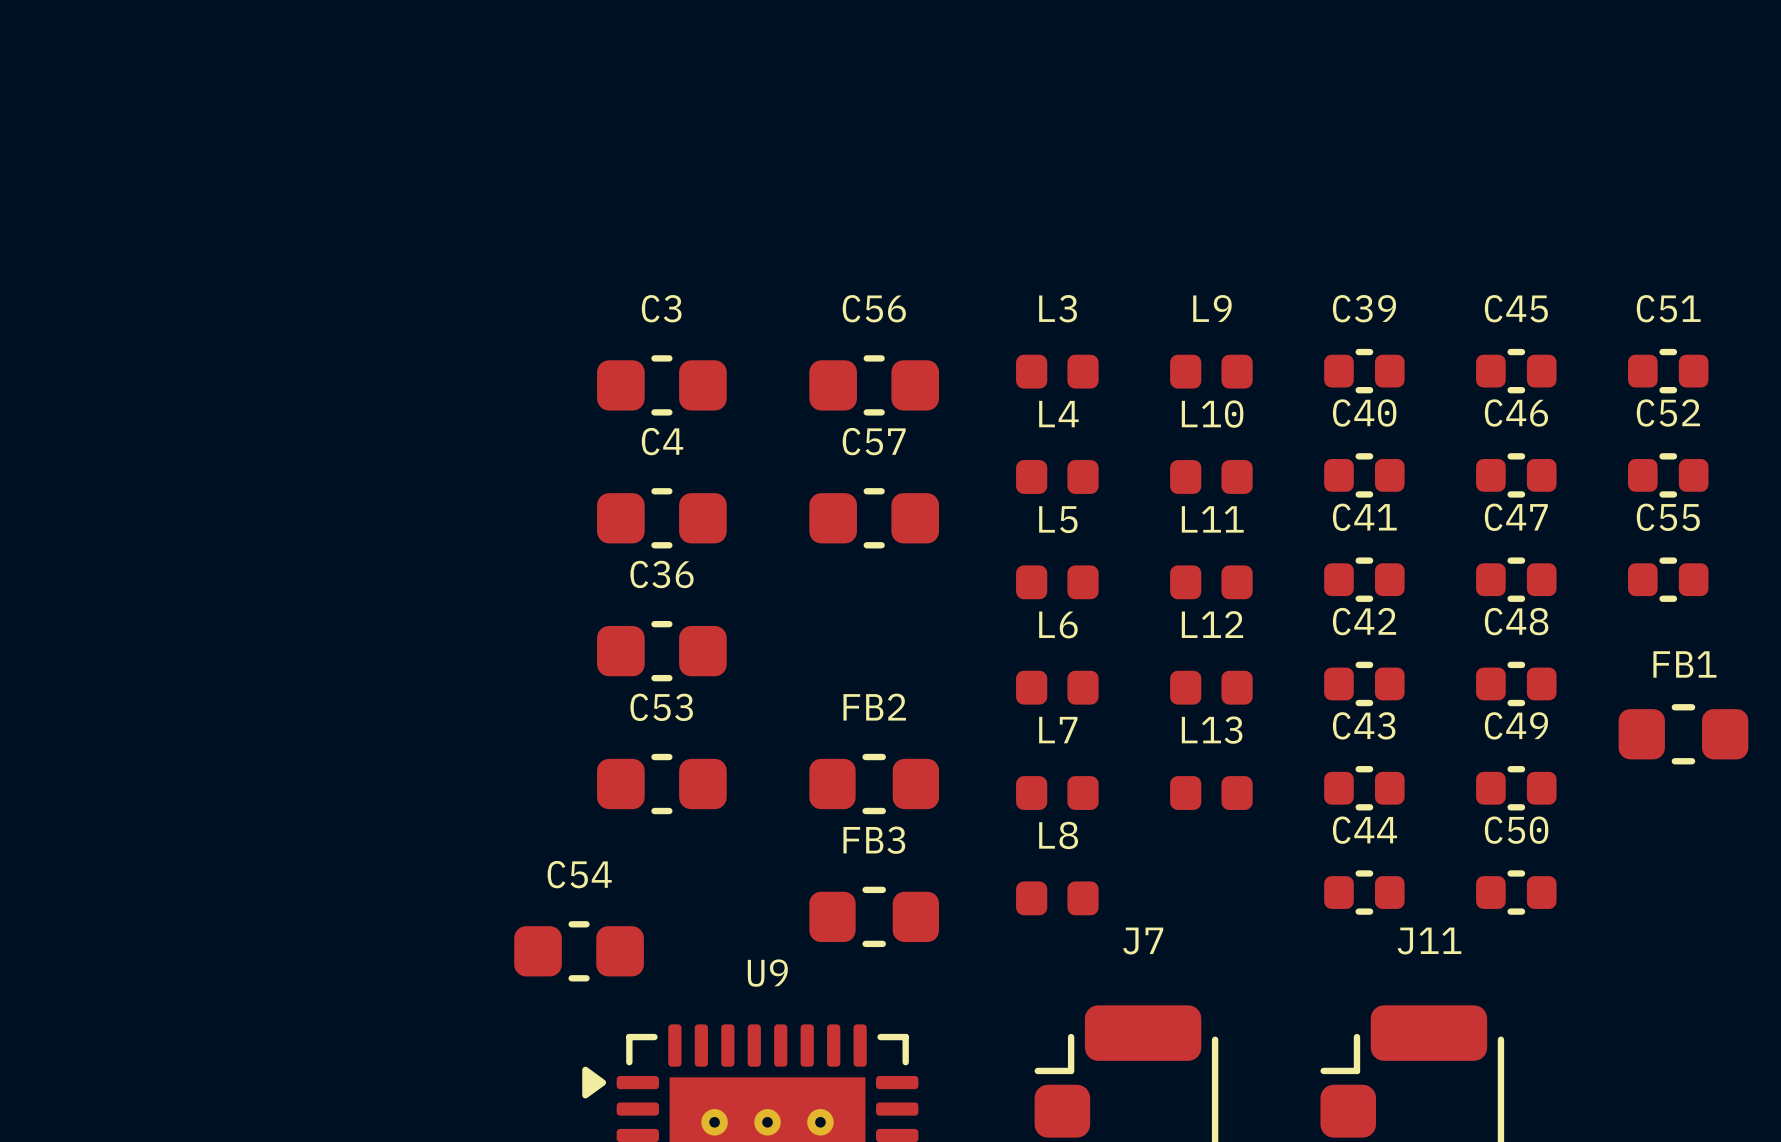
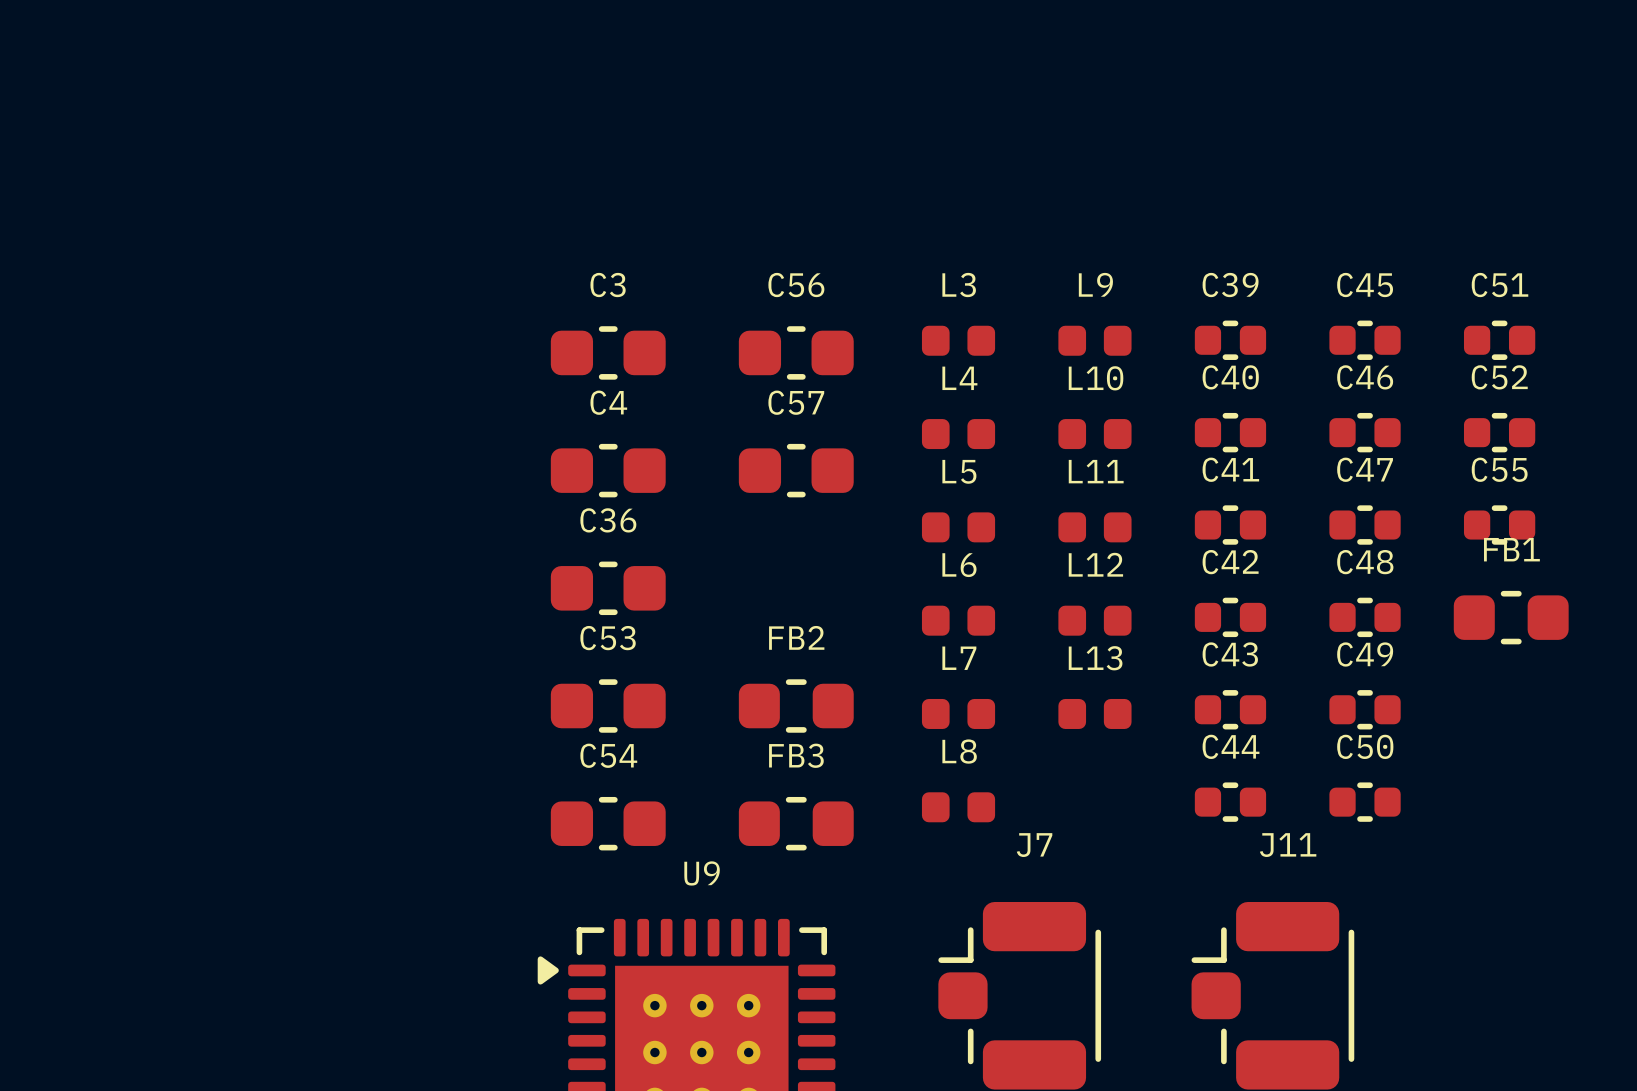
FB1 name position: FB1 (1684, 664) -> FB1 (1511, 549)
FB1 position: (1683, 734) -> (1511, 617)
C54 position: (579, 951) -> (608, 823)

